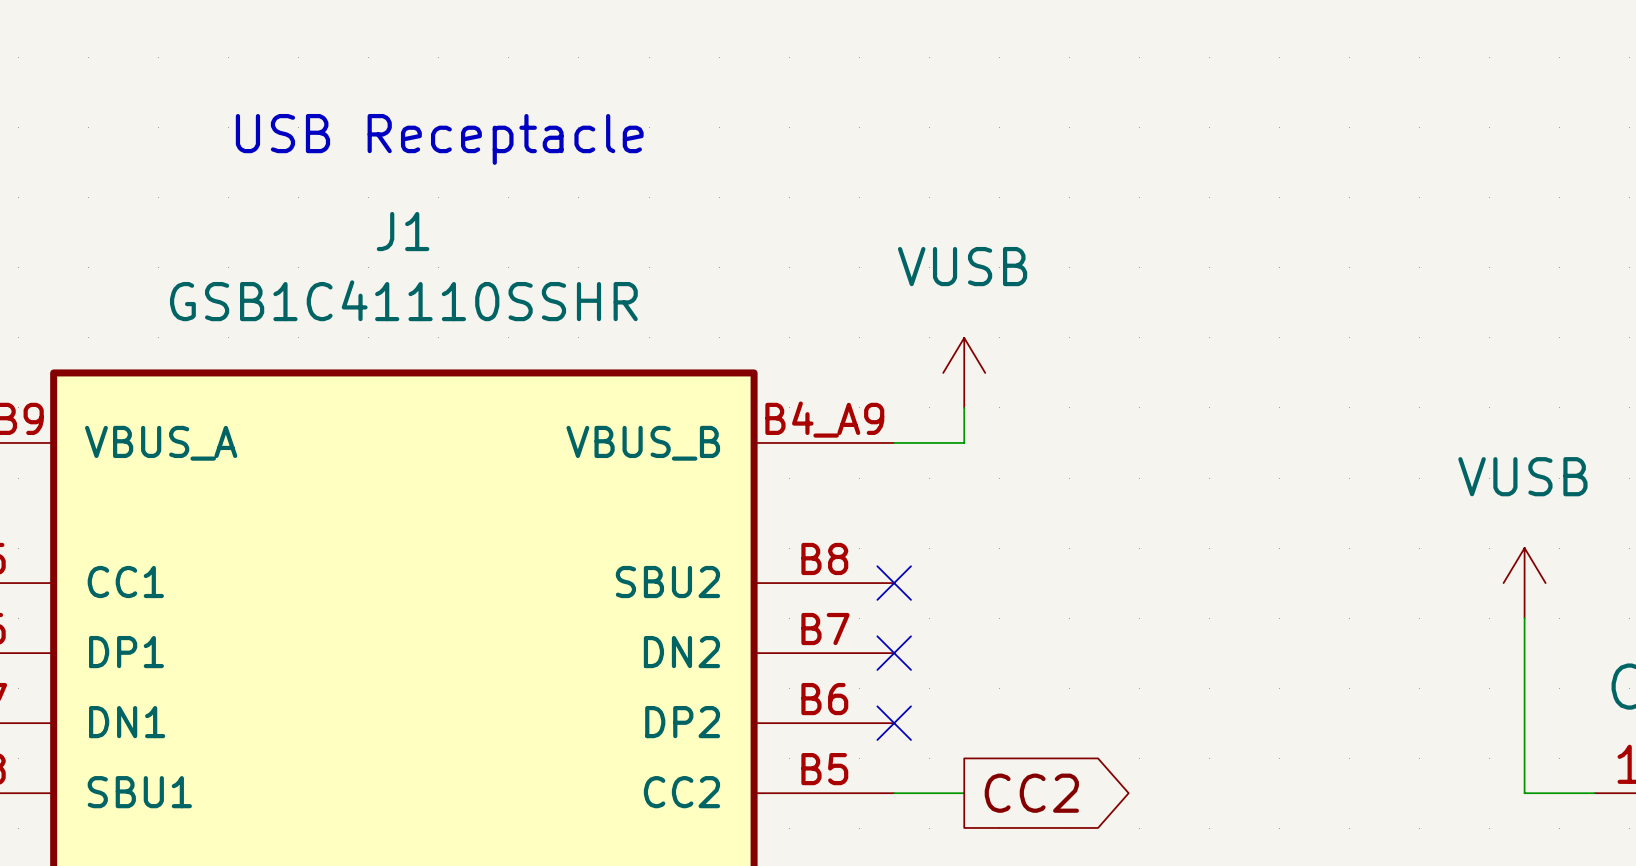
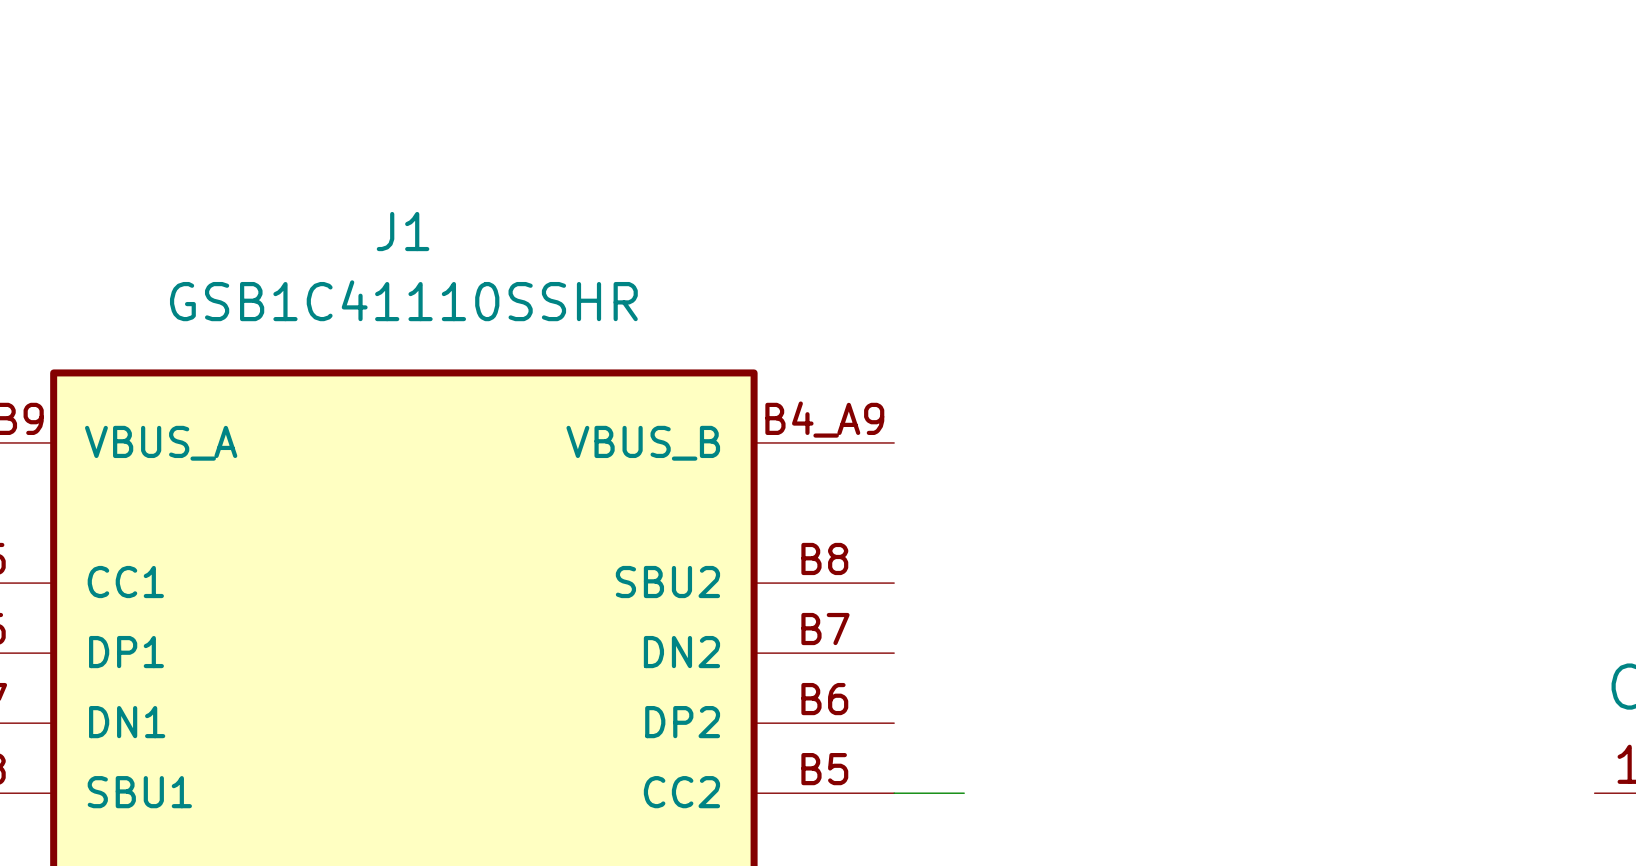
text: USB Receptacle (439, 139) -> none
power symbol: VUSB (964, 372) -> none
wire: (964, 407) (964, 442) (894, 442) -> none
no-connect mark: (894, 583) -> none
power symbol: VUSB (1524, 583) -> none
wire: (1524, 618) (1524, 793) (1594, 793) -> none
no-connect mark: (894, 653) -> none
no-connect mark: (894, 723) -> none
global label: CC2 (1031, 793) -> none

